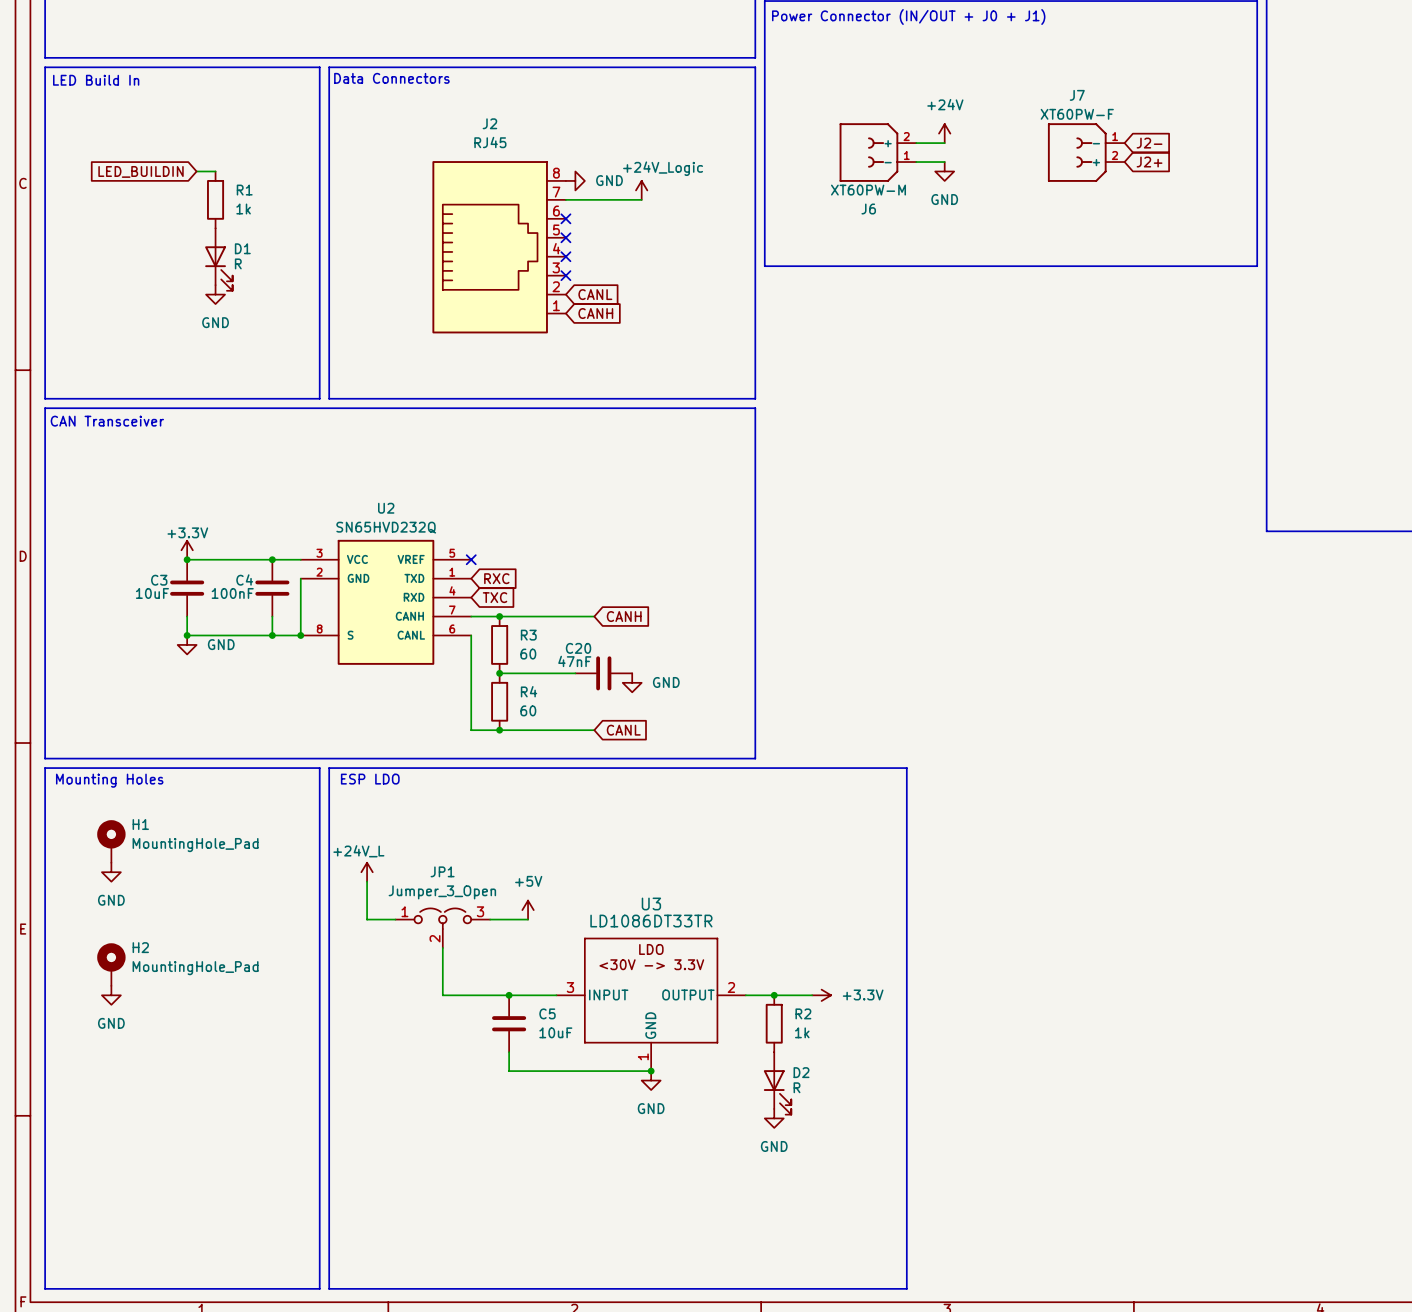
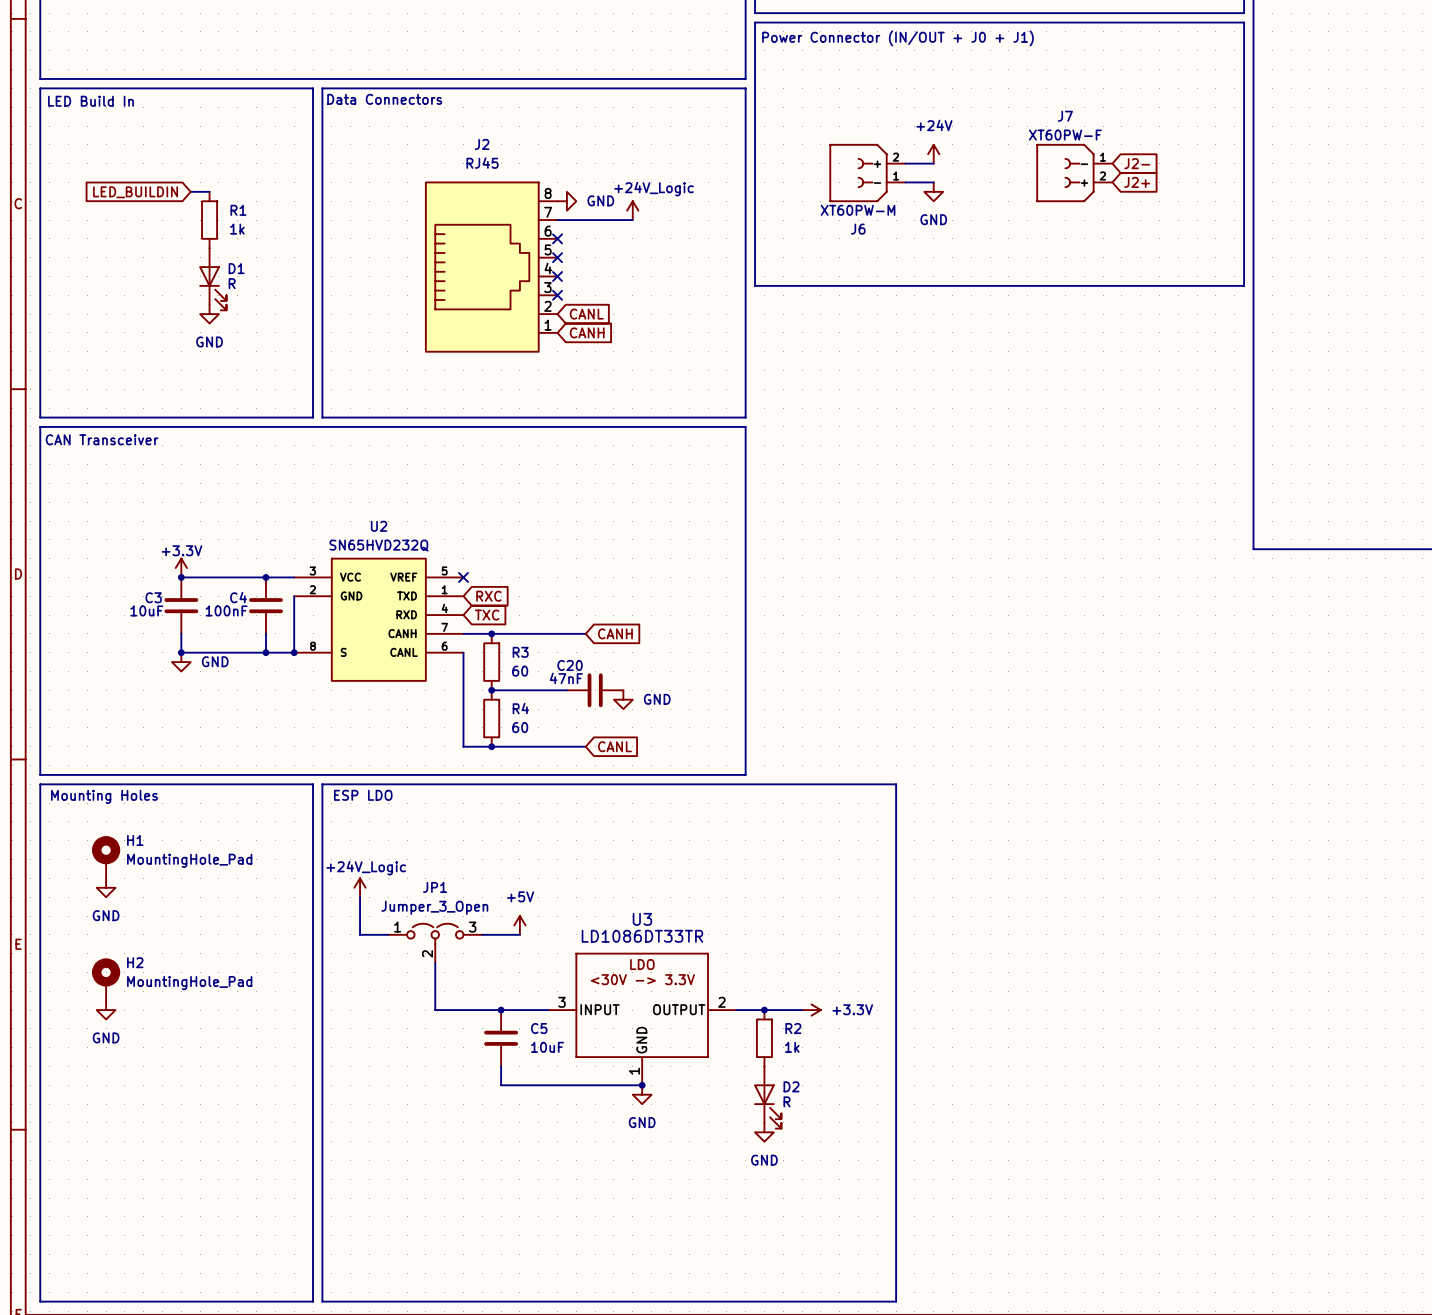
power symbol: +24V_L (367, 872) -> +24V_Logic (360, 887)

